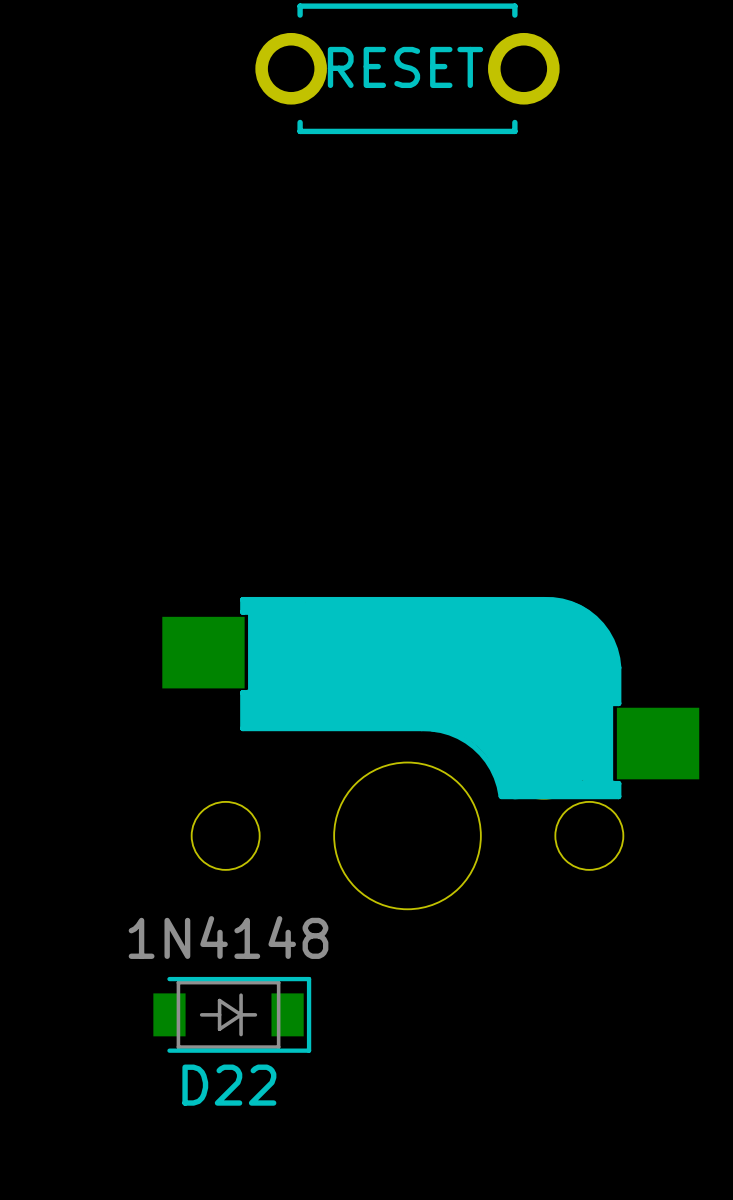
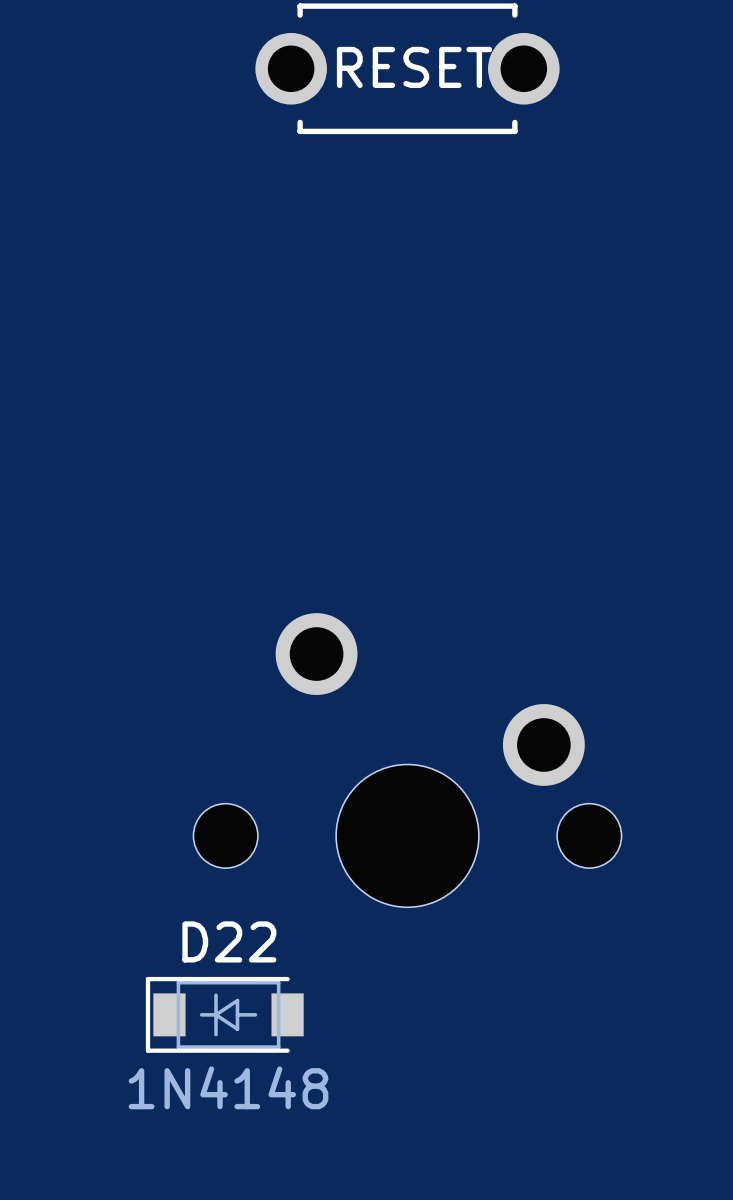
part rotation: 0° (407, 68) -> 180° (407, 68)
part footprint: [162, 596, 700, 910] -> [193, 613, 622, 908]
D22 rotation: 0° (232, 1014) -> 180° (224, 1014)

